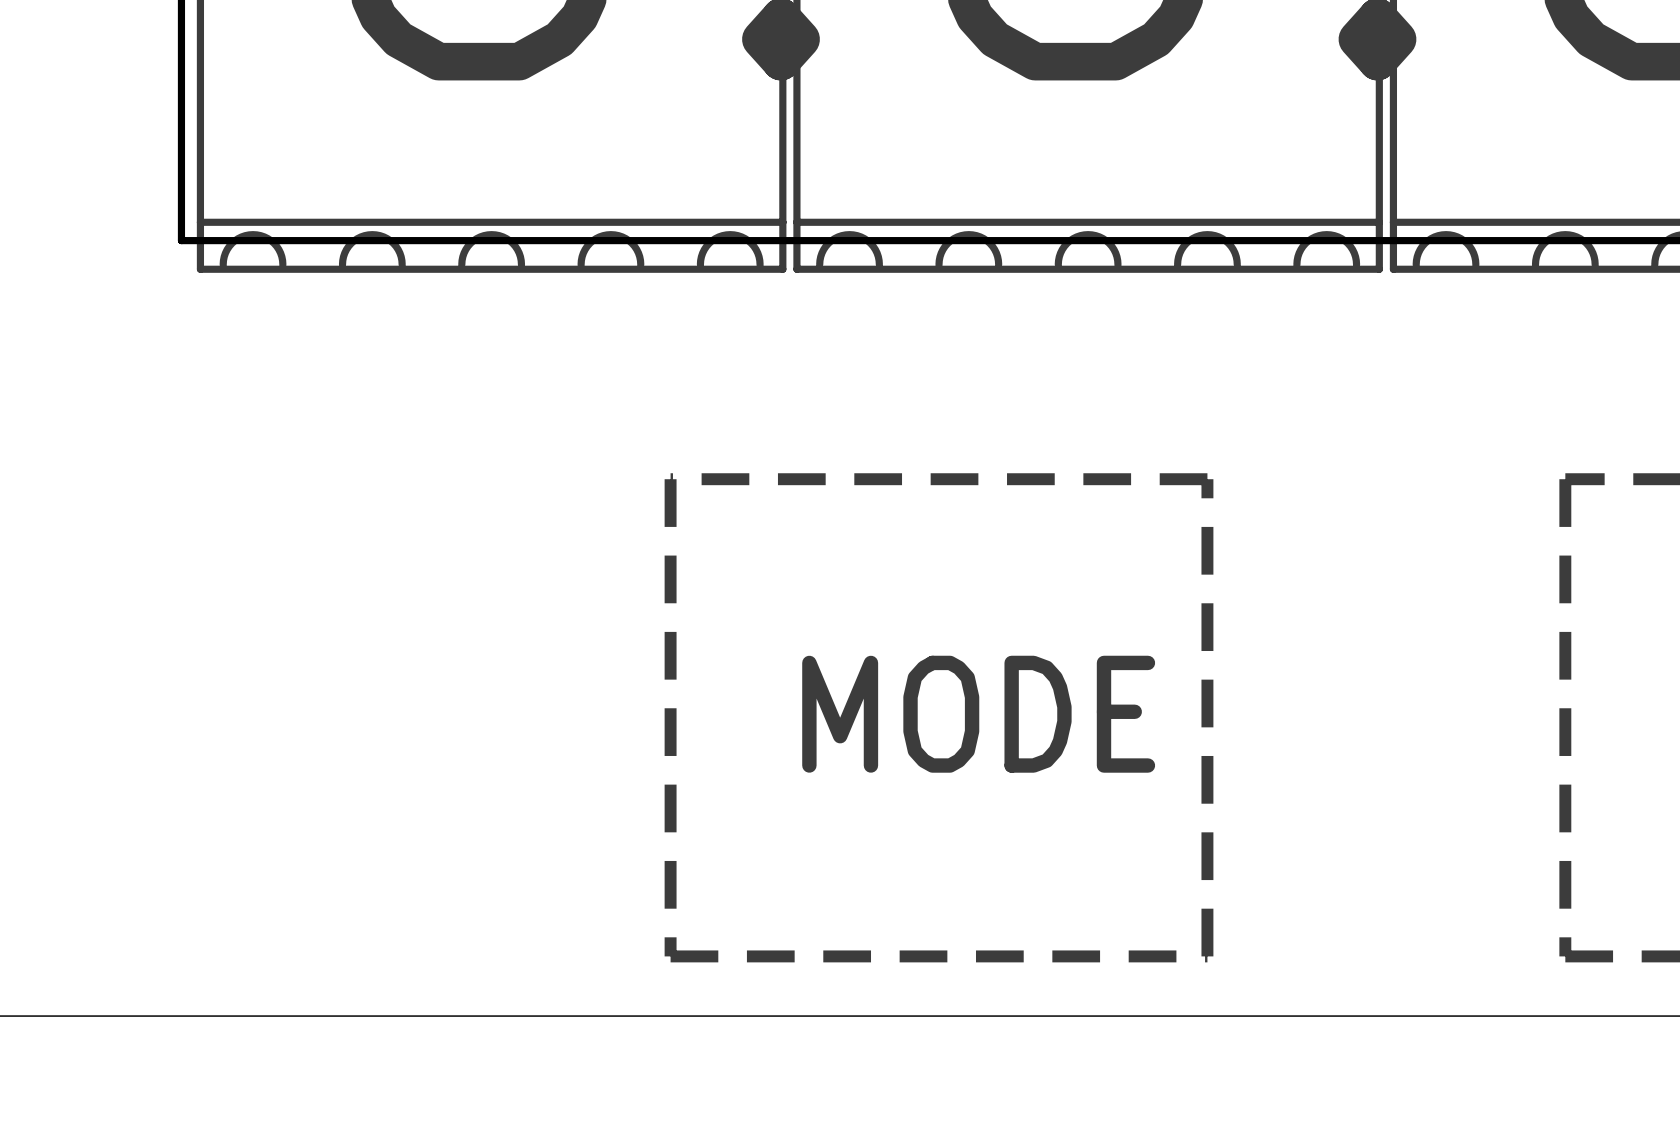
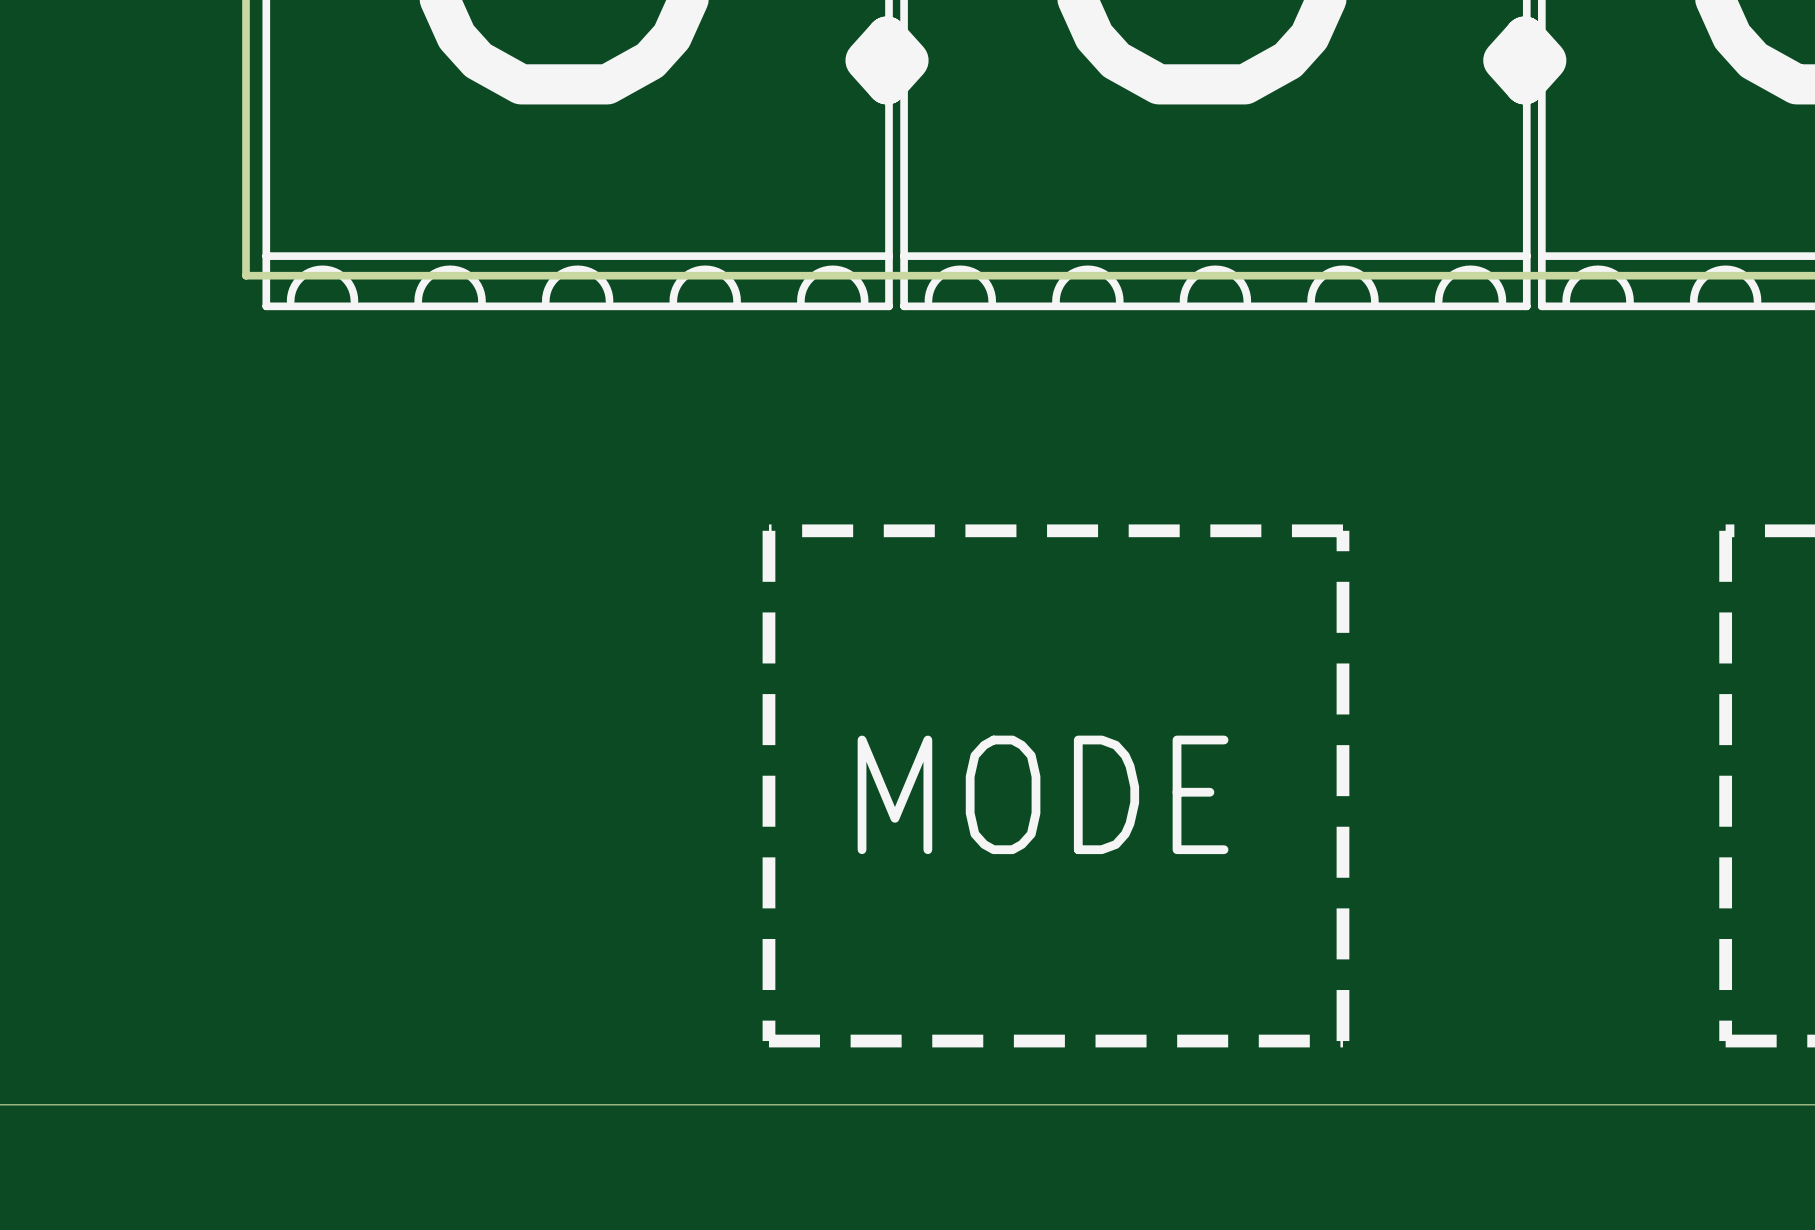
text position: MODE (978, 714) -> MODE (1043, 794)

